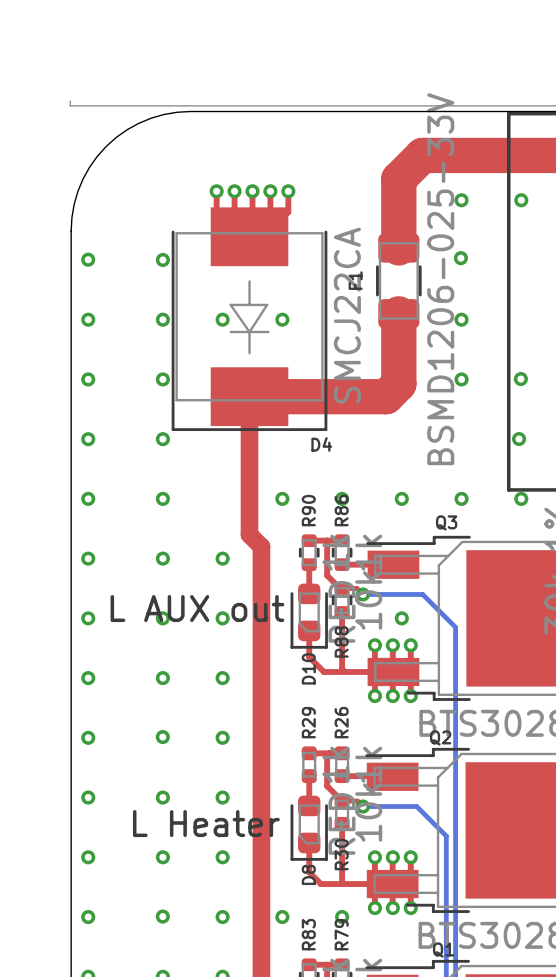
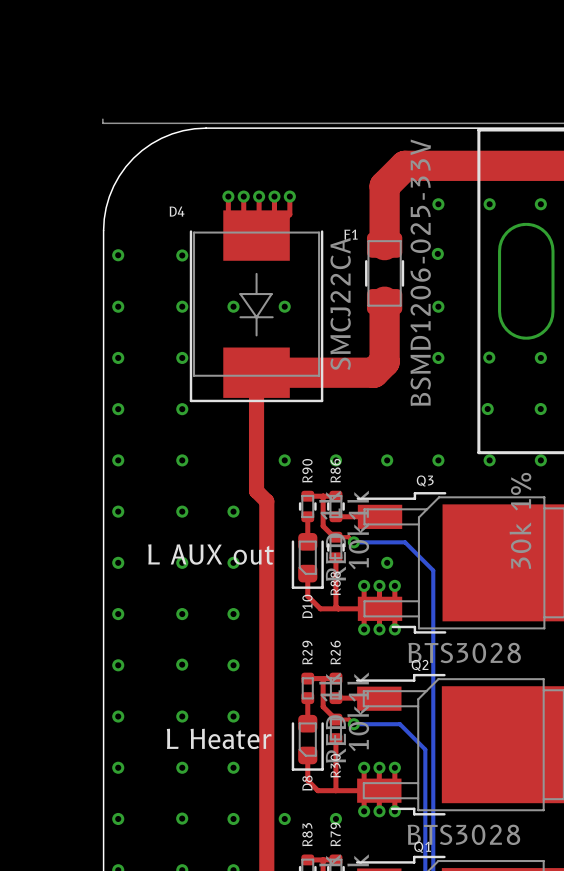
F1 name rotation: 0° (355, 280) -> 90° clockwise (351, 234)
F1 name position: F1 (355, 280) -> F1 (351, 234)
D4 name position: D4 (321, 444) -> D4 (177, 211)

